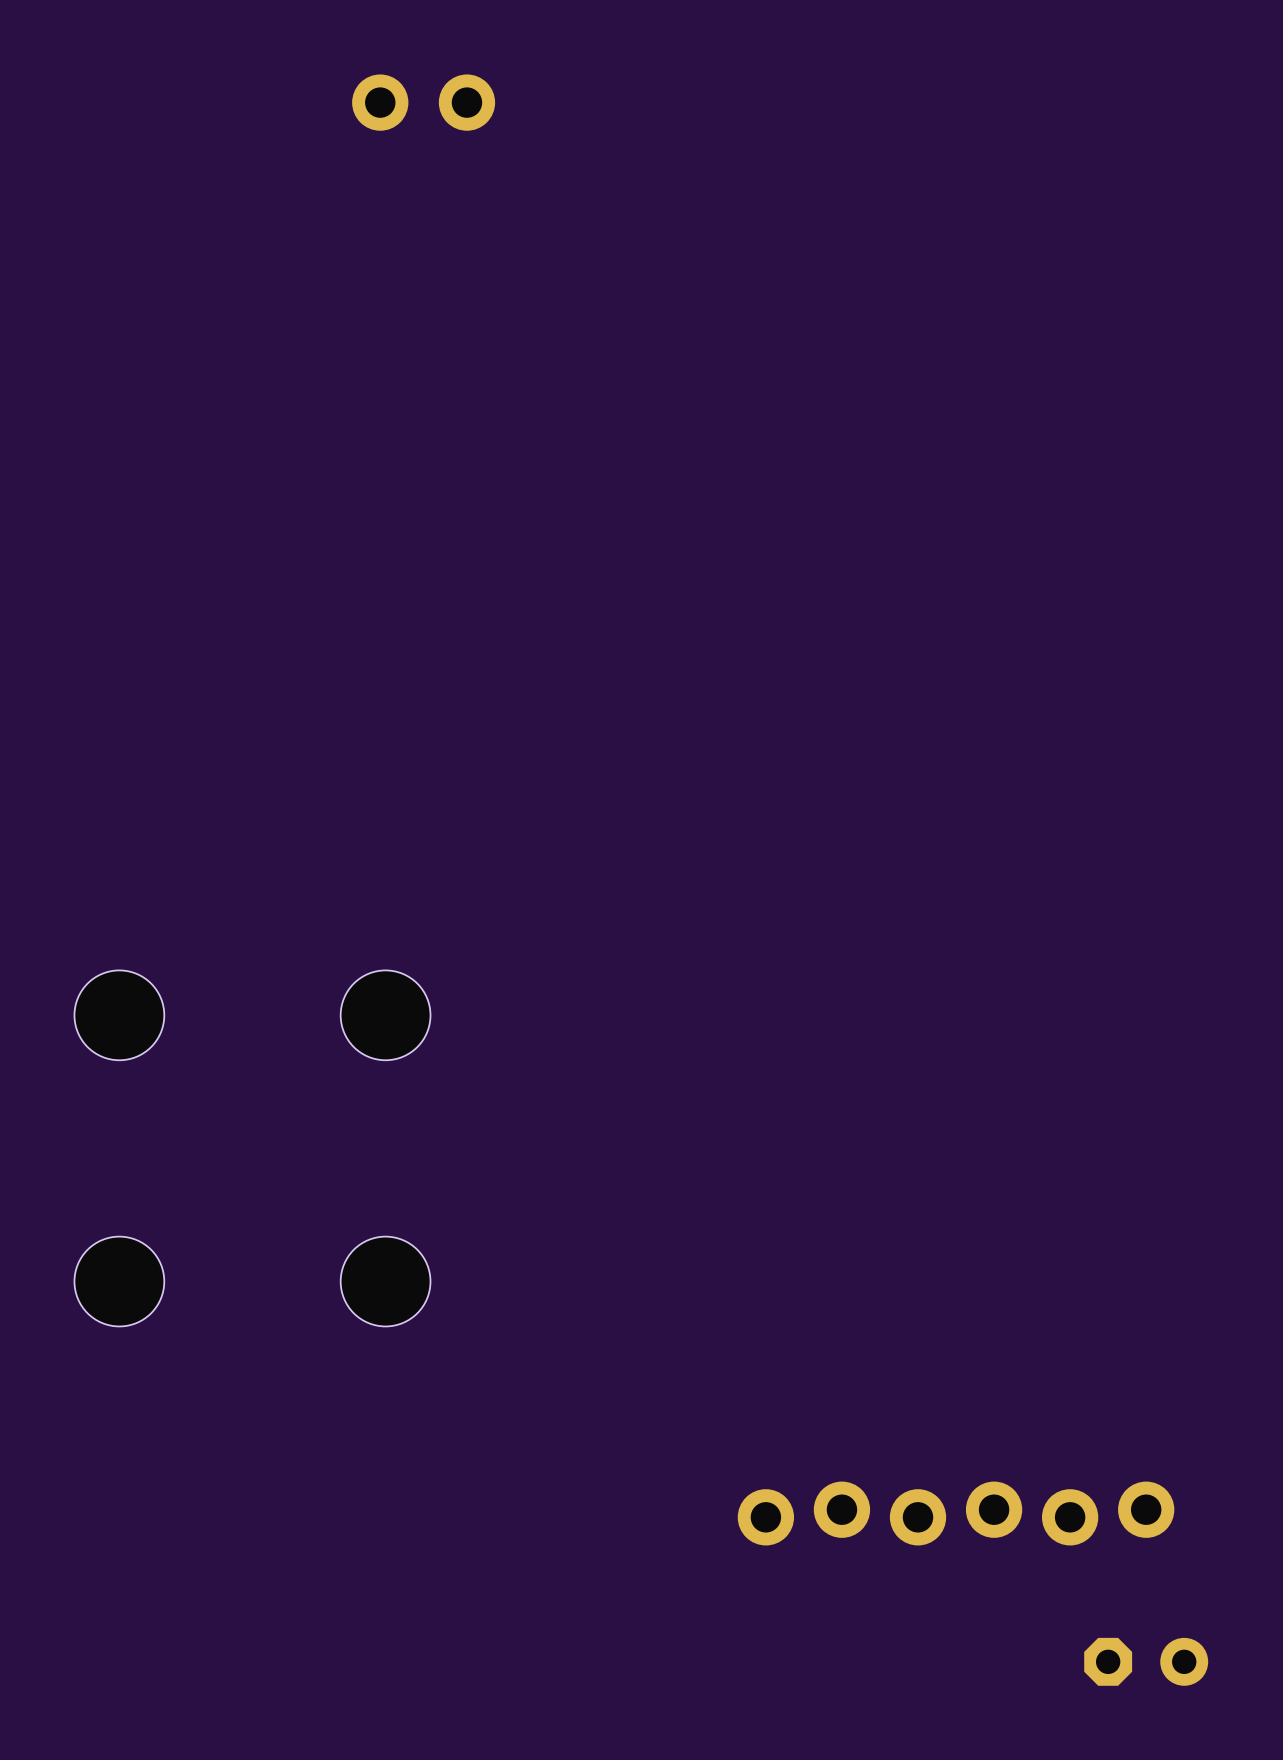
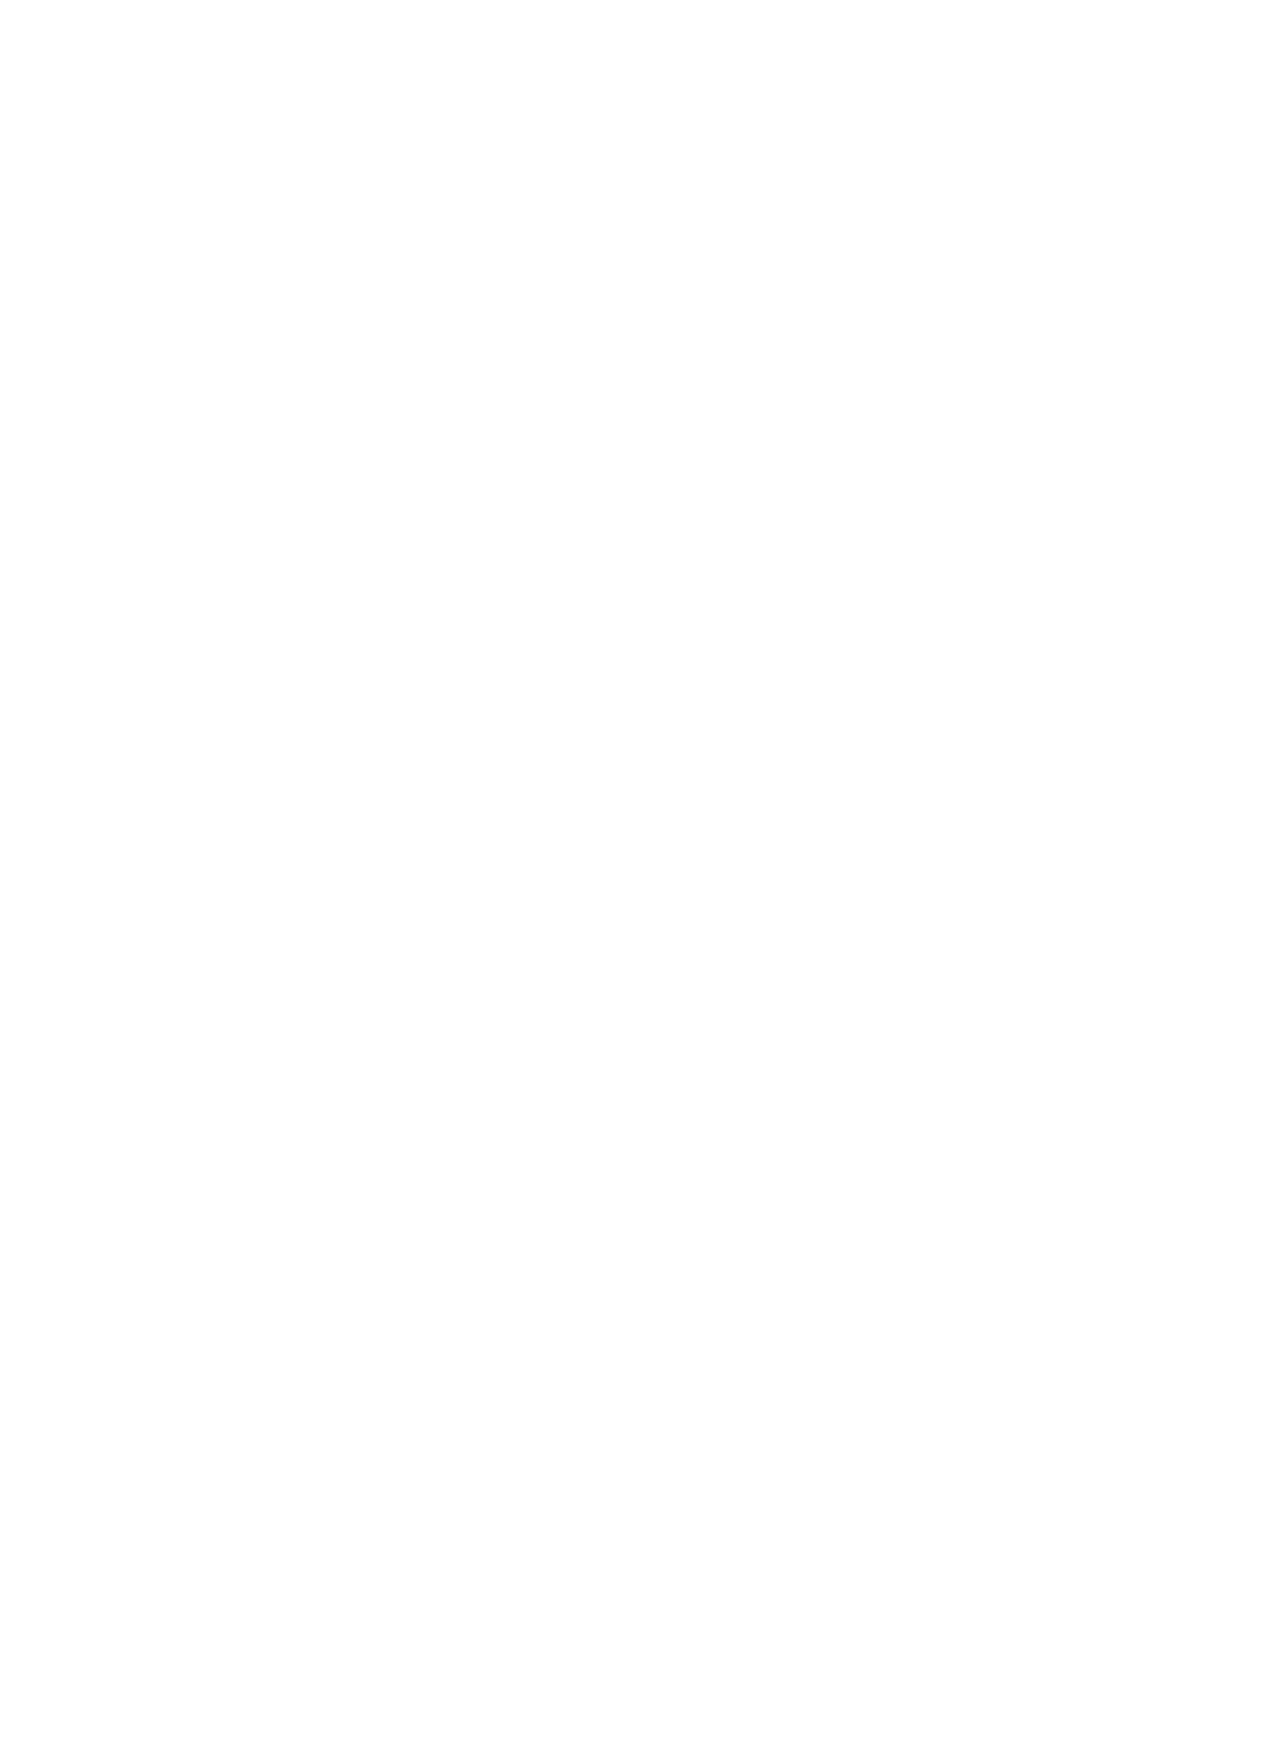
part: (423, 102) -> none
part: (119, 1015) -> none
part: (385, 1015) -> none
part: (119, 1281) -> none
part: (385, 1281) -> none
part: (956, 1513) -> none
part: (1146, 1661) -> none

